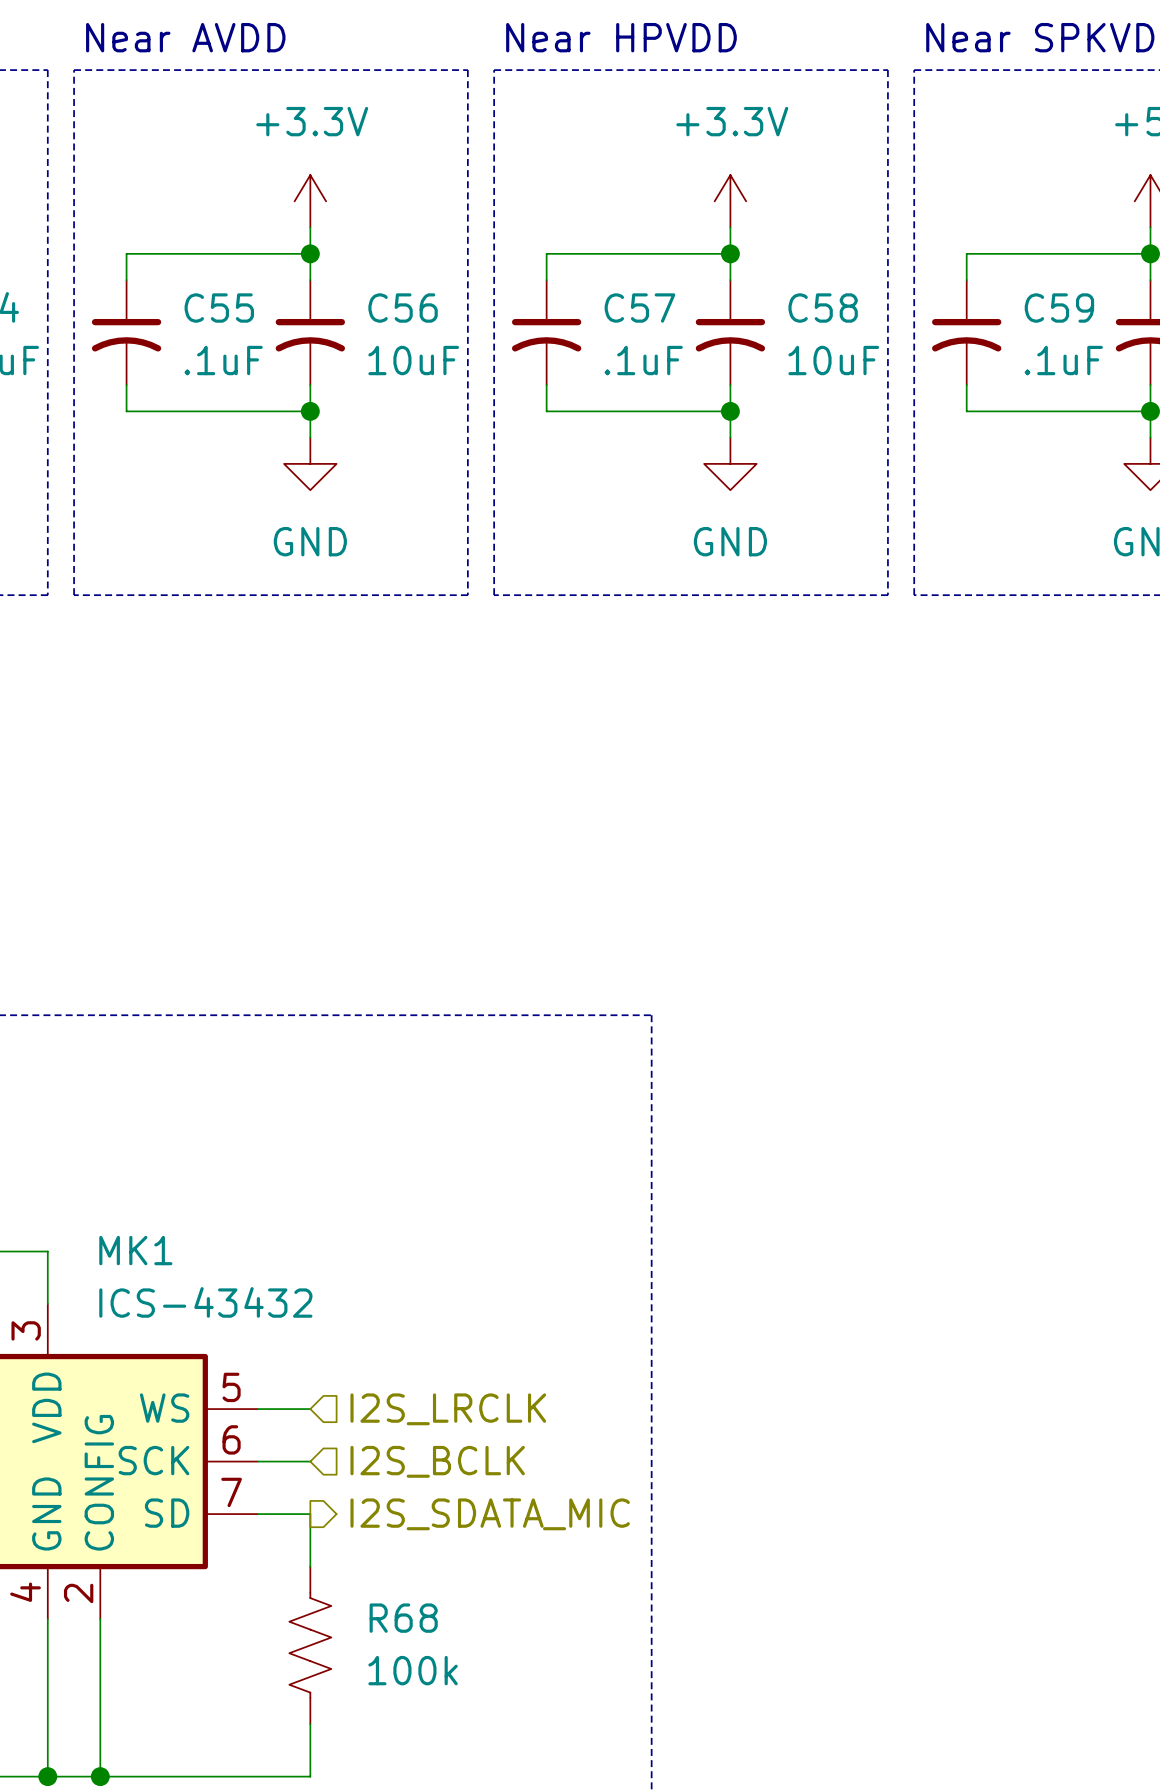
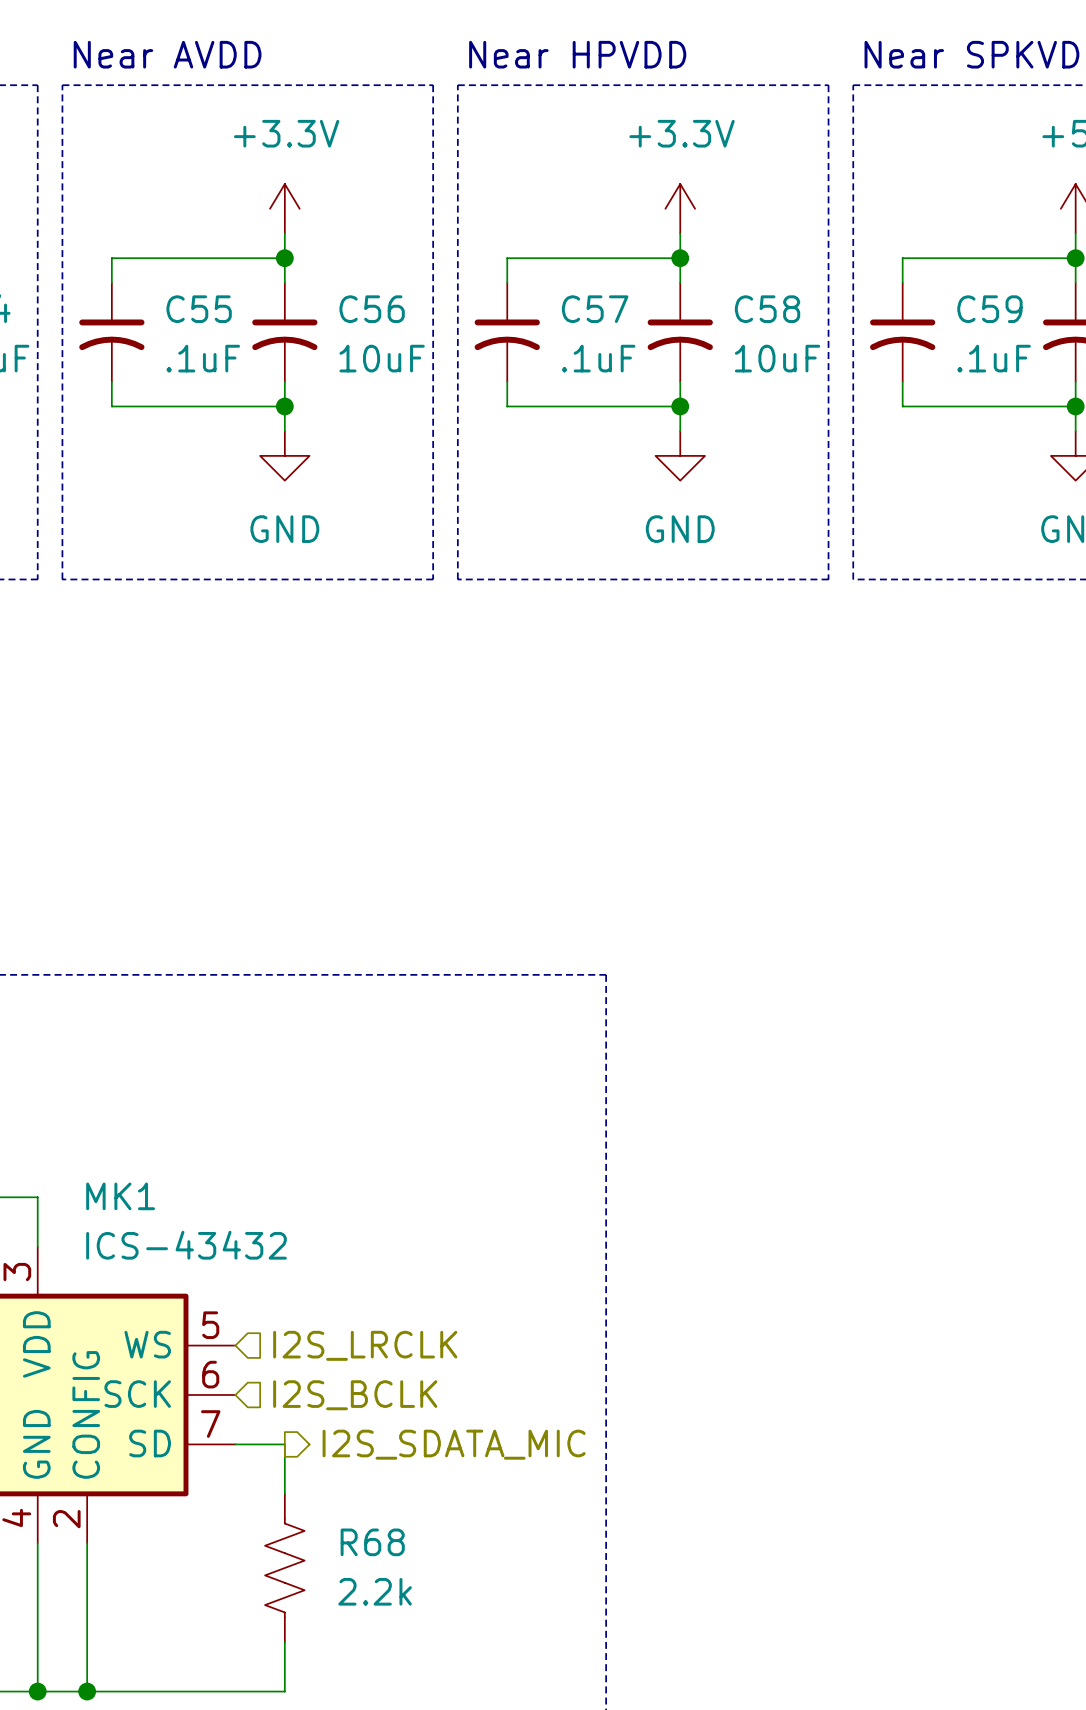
wire: (257, 1409) (310, 1409) -> none
hierarchical label position: I2S_LRCLK (448, 1409) -> I2S_LRCLK (365, 1345)
wire: (257, 1461) (310, 1461) -> none
hierarchical label position: I2S_BCLK (437, 1461) -> I2S_BCLK (355, 1395)
R68 value: 100k (413, 1670) -> 2.2k (375, 1591)

